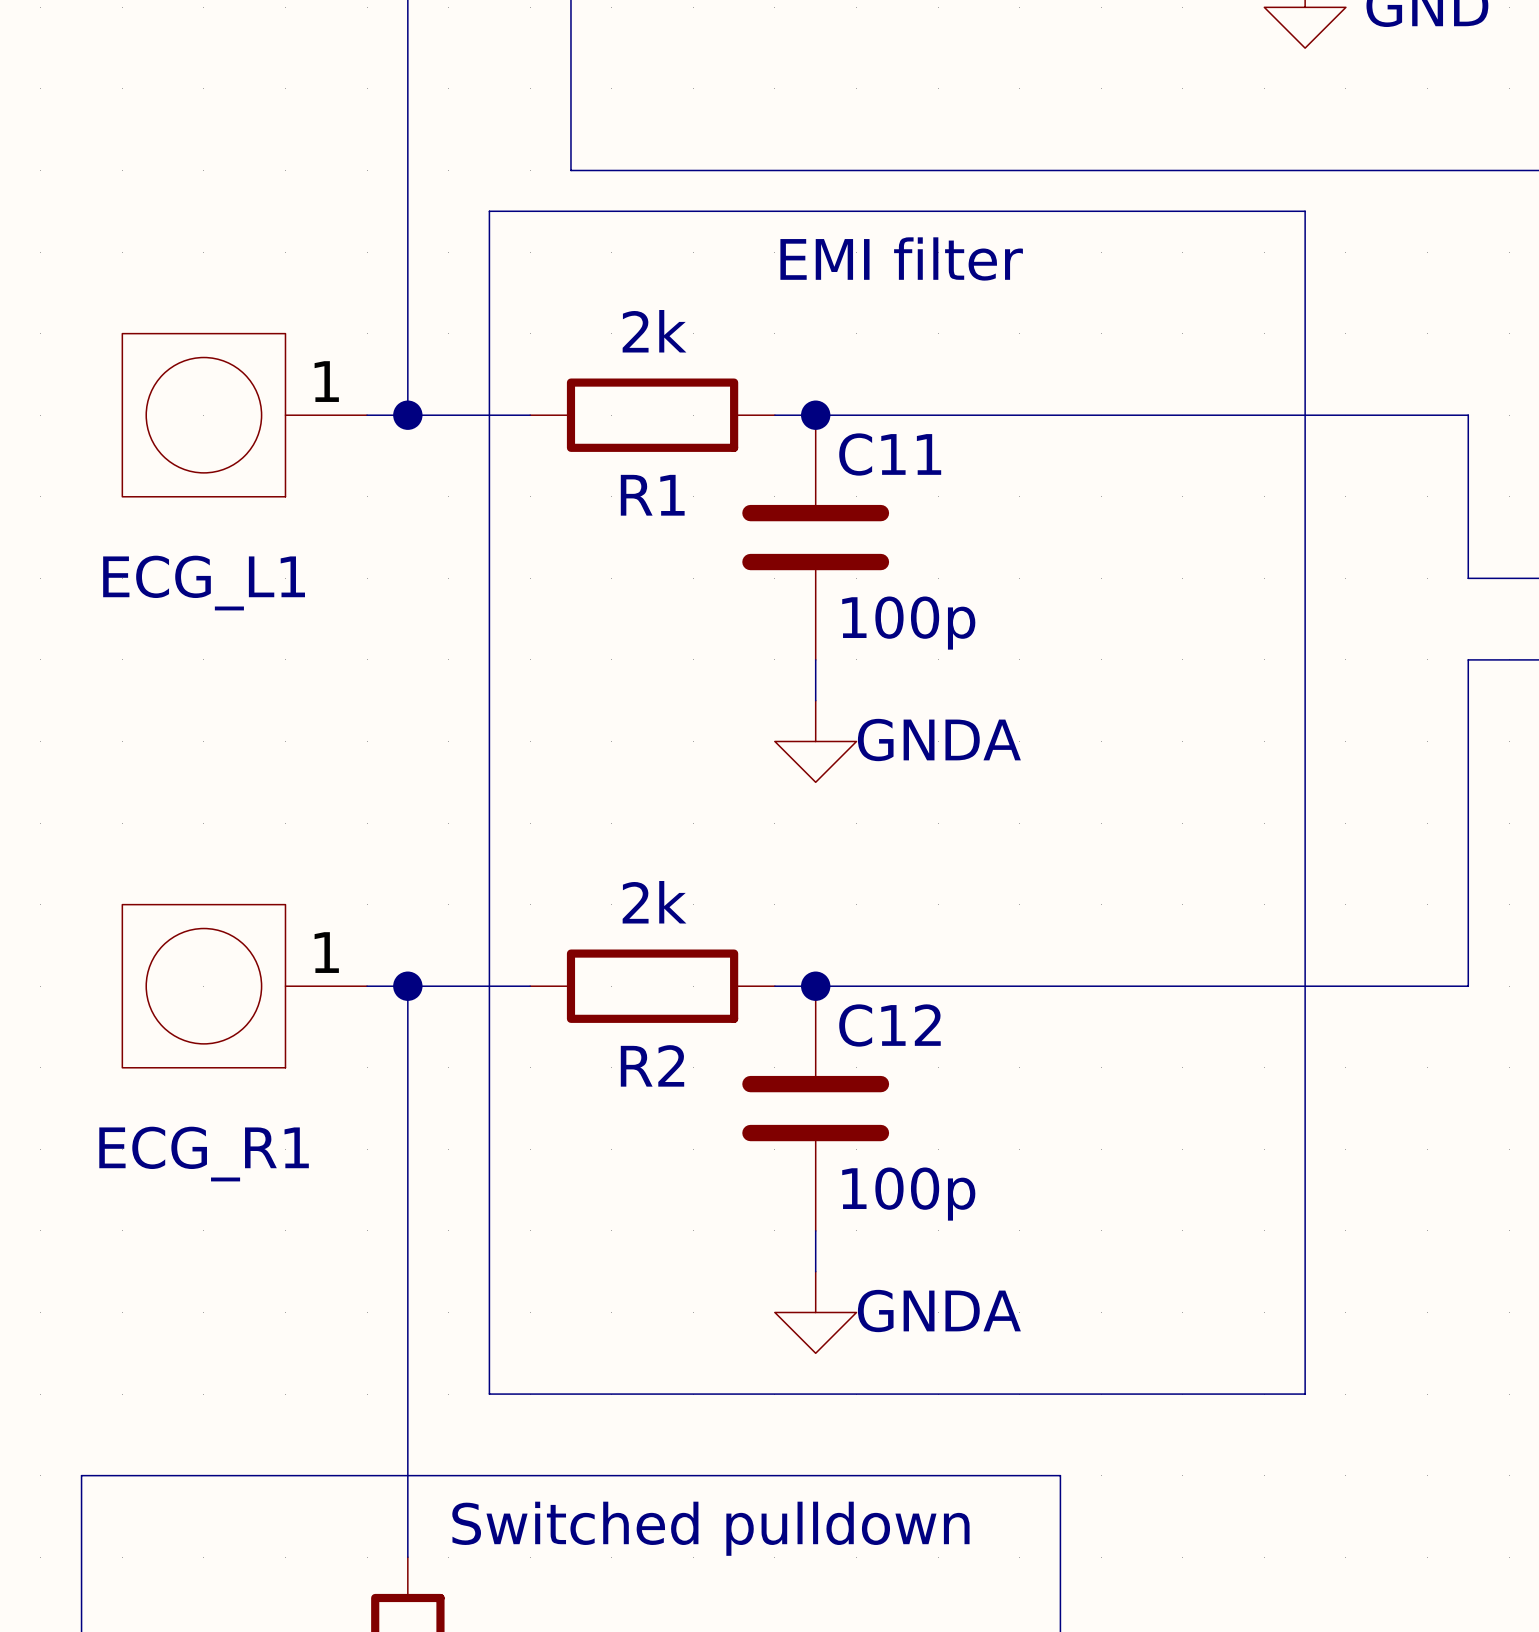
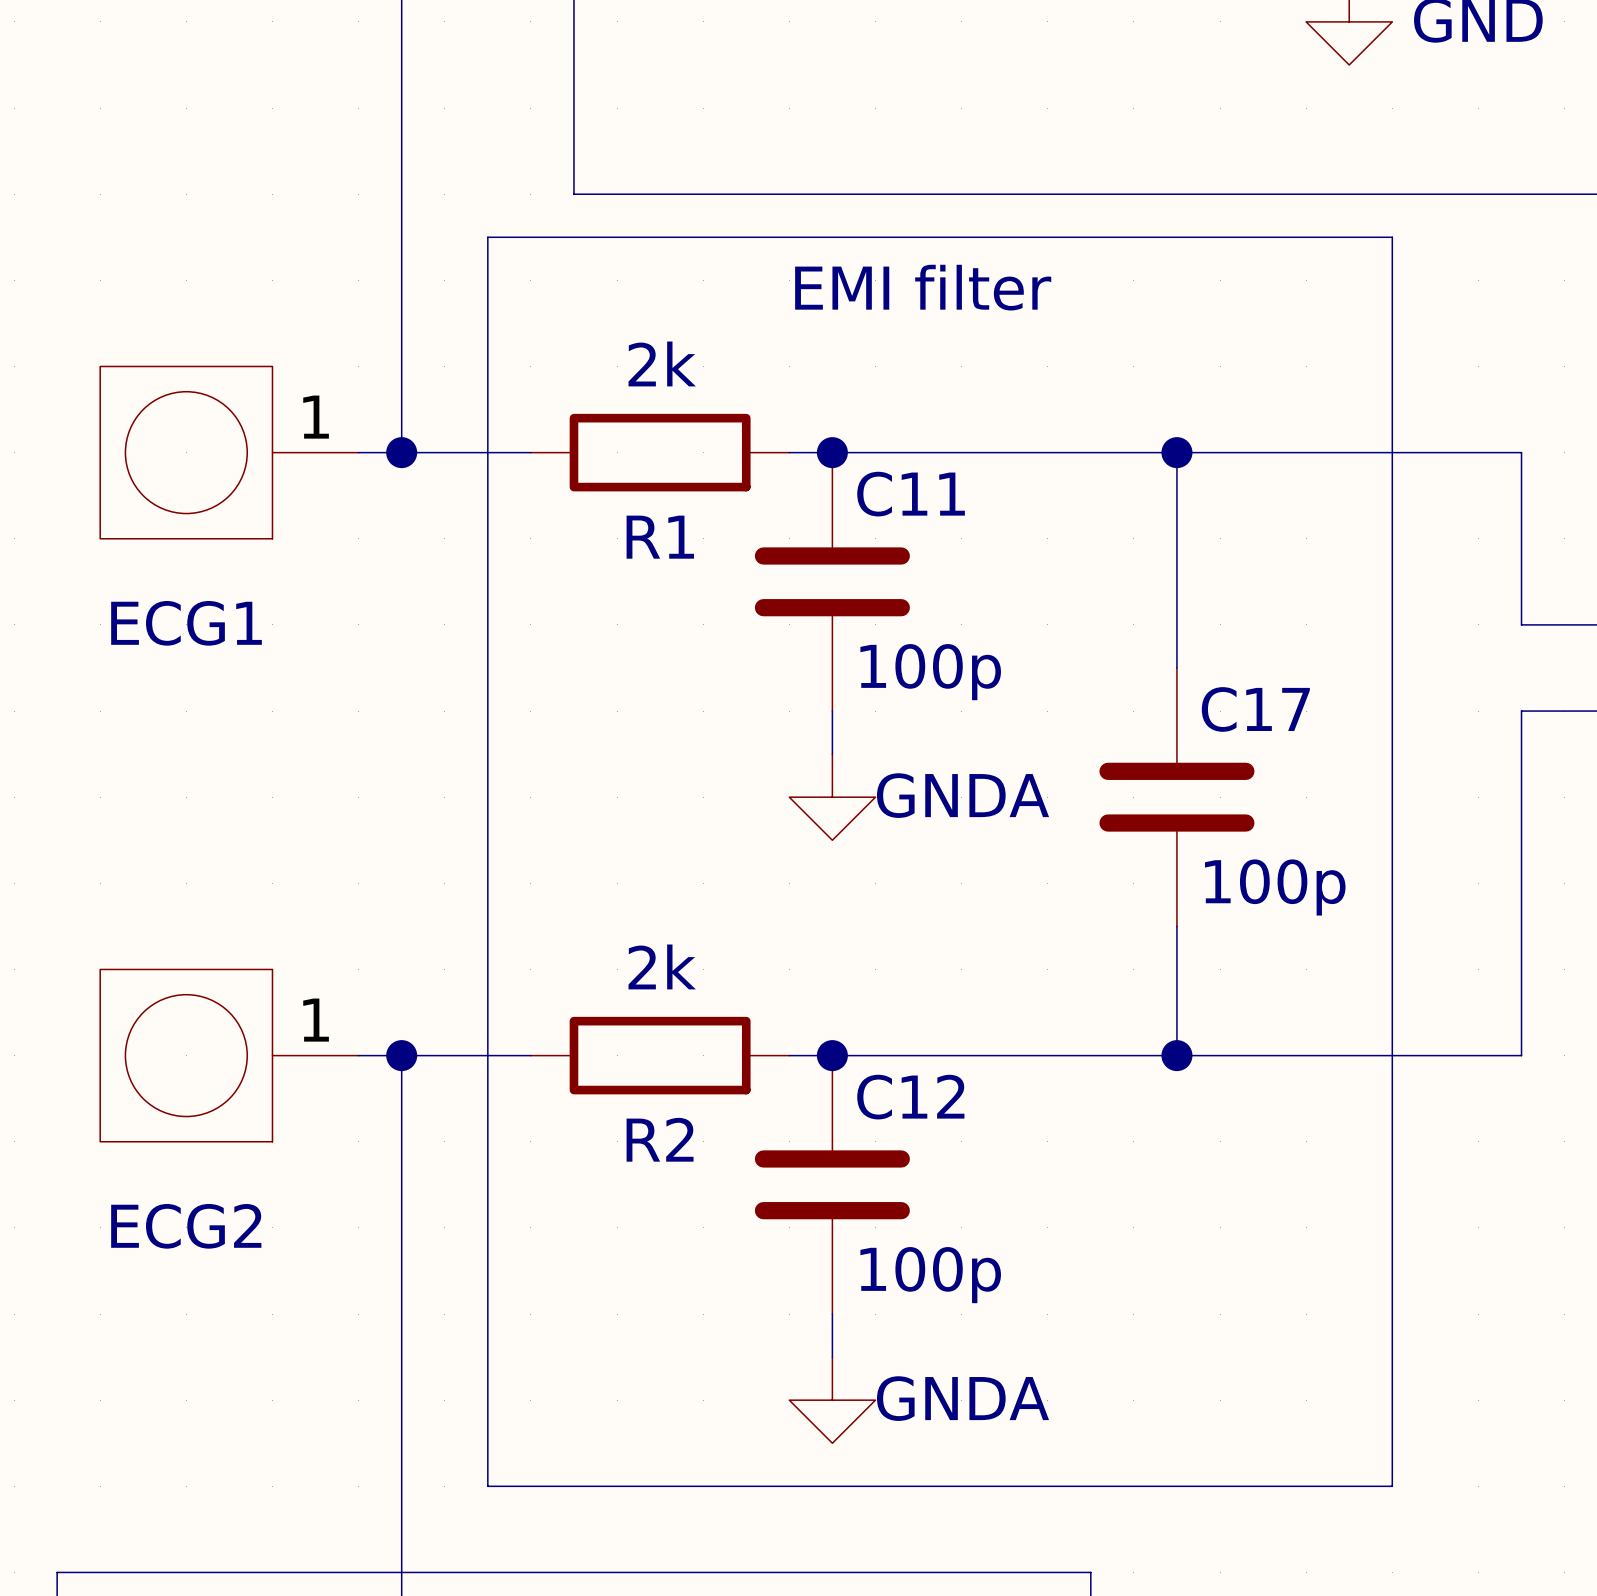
line: (1305, 211) (1305, 1394) -> (1349, 237) (1392, 237) (1392, 1486) (1349, 1486)
wire: none -> (1176, 452) (1176, 667)
junction: none -> (1176, 452)
ECG_L1 name: ECG_L1 (204, 583) -> ECG1 (186, 623)
C17: none -> 100p (1176, 797)
wire: none -> (1176, 926) (1176, 1055)
junction: none -> (1176, 1055)
ECG_R1 name: ECG_R1 (204, 1154) -> ECG2 (186, 1226)

